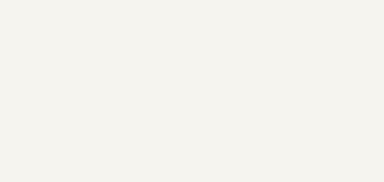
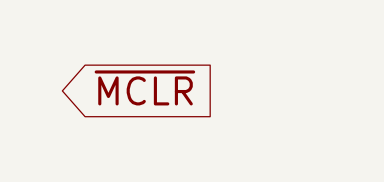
global label: none -> ~{MCLR} (144, 87)

